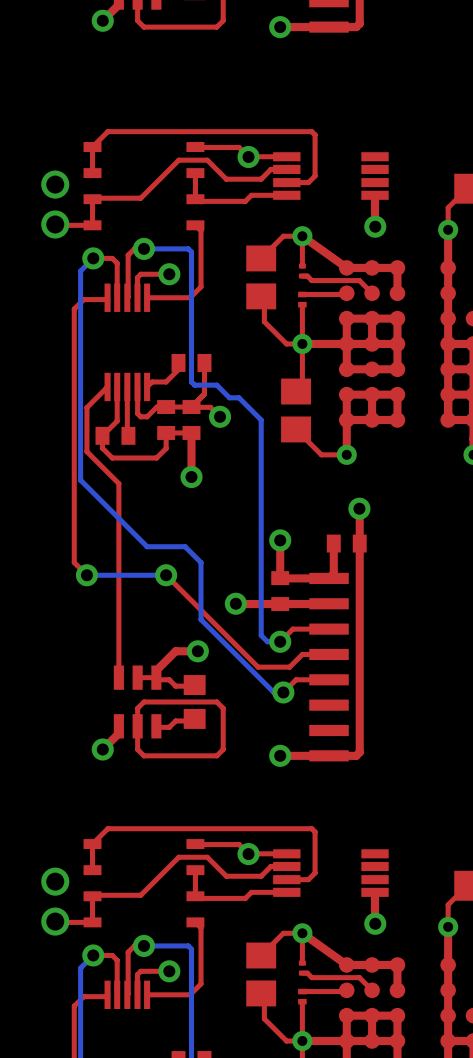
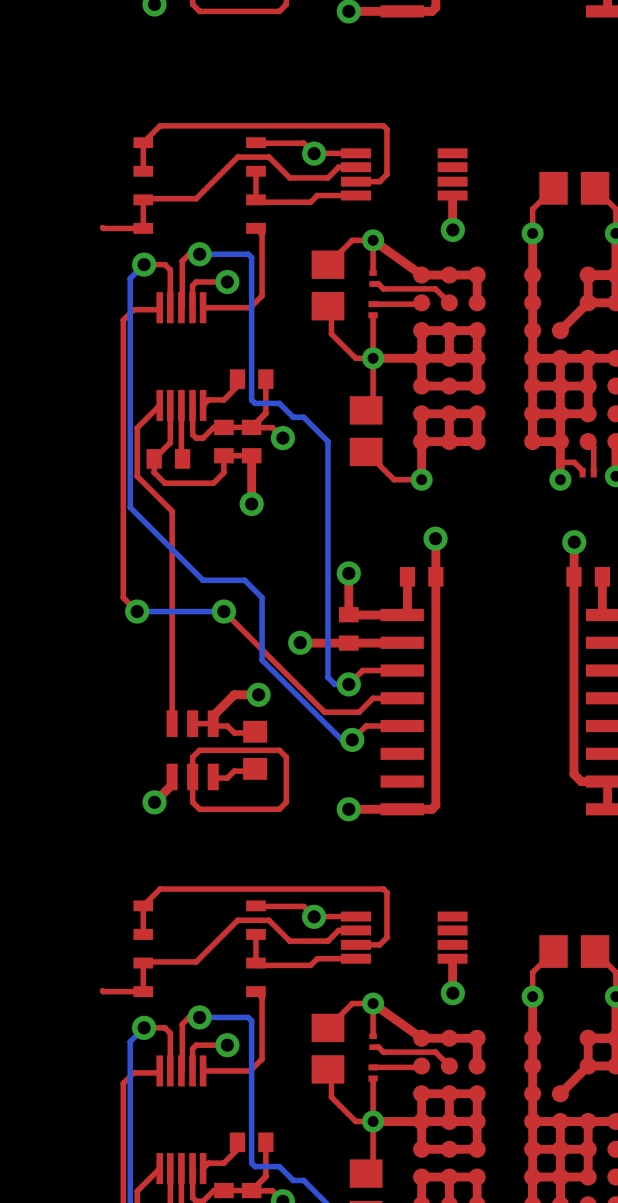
part: (55, 204) -> none
part: (55, 901) -> none

